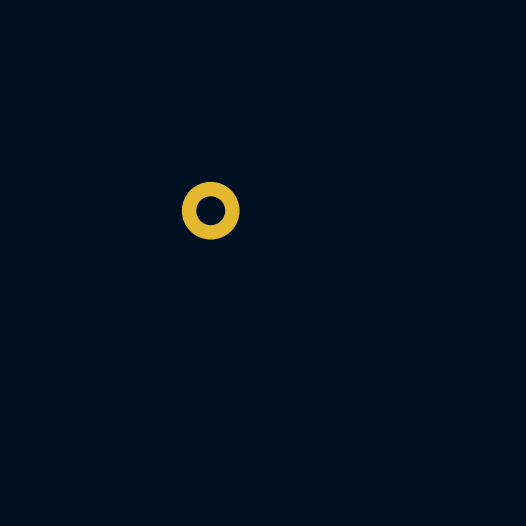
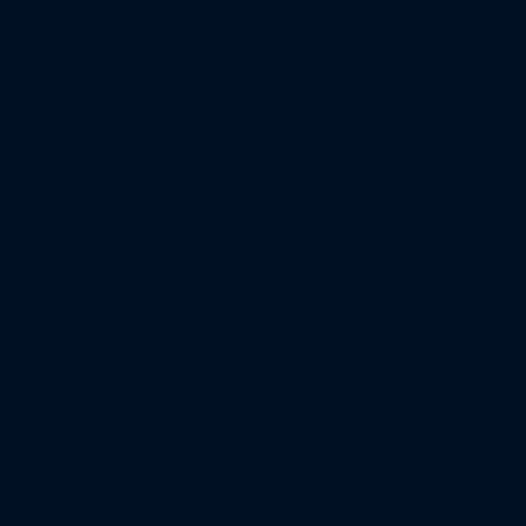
part: (210, 210) -> none

